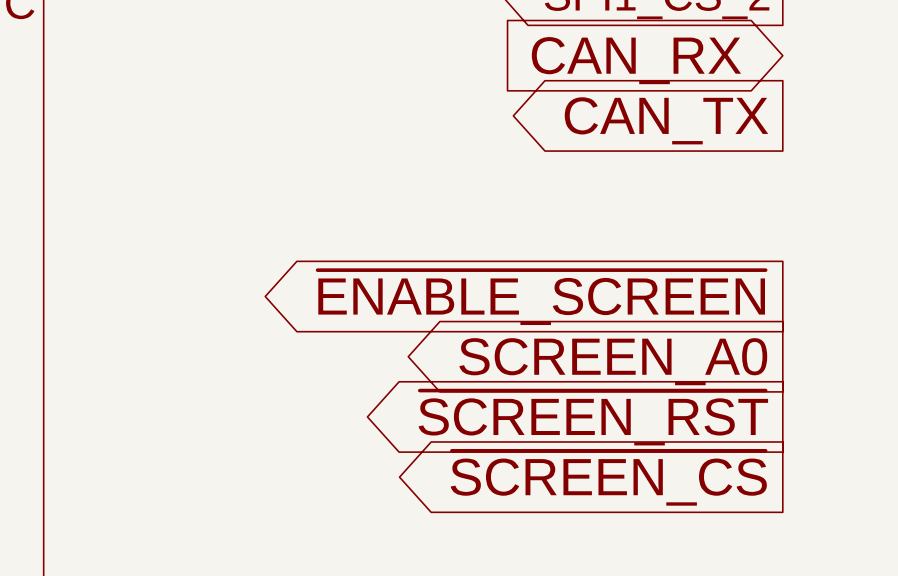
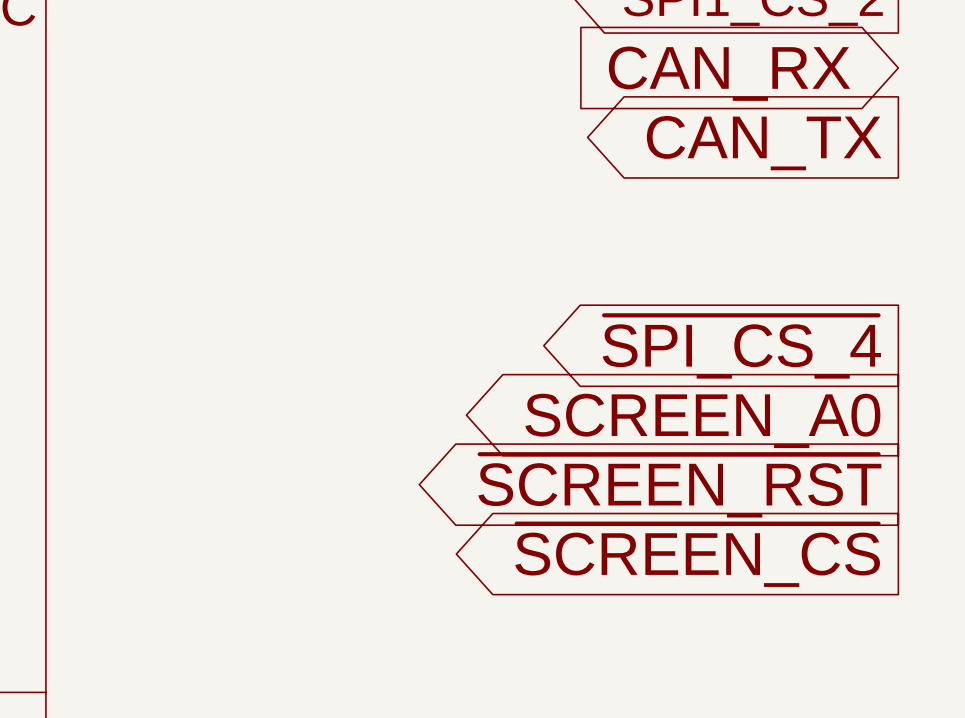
global label: ~{ENABLE_SCREEN} (541, 297) -> ~{SPI_CS_4} (741, 346)

